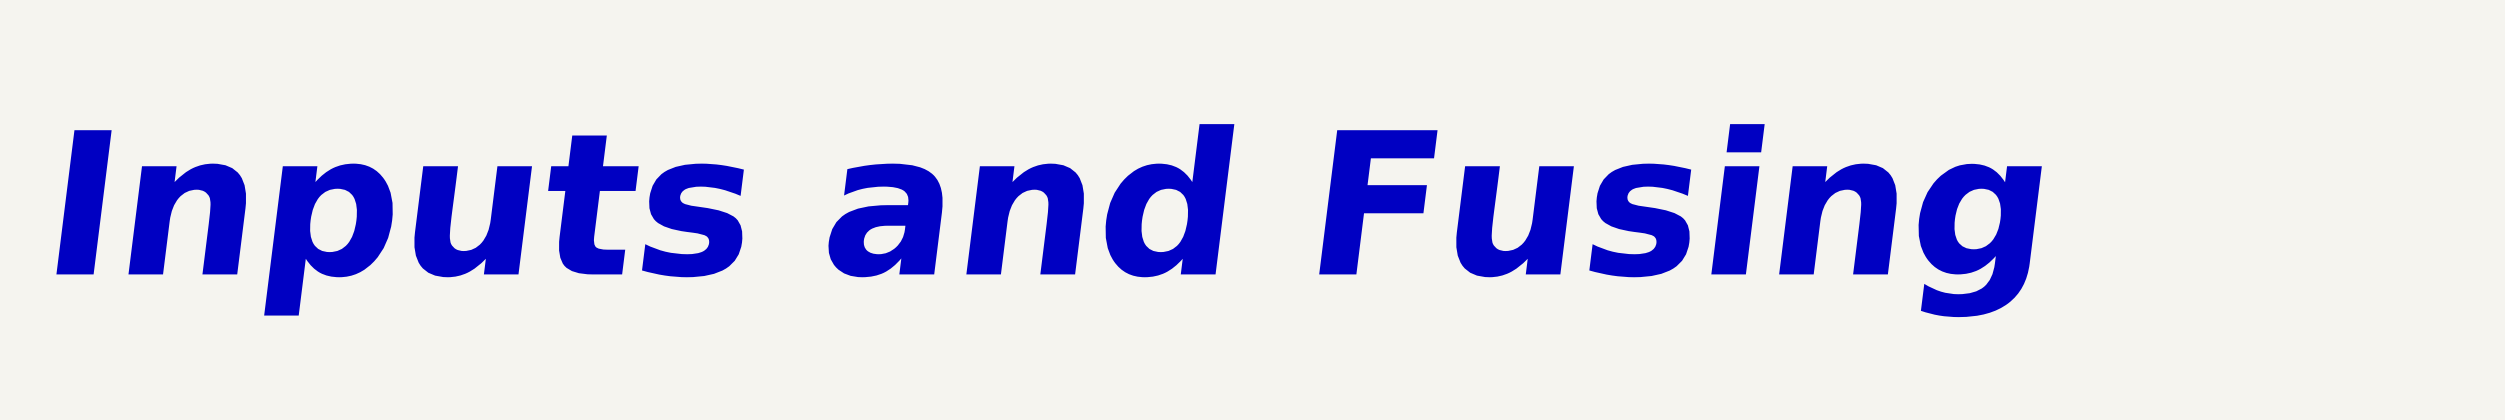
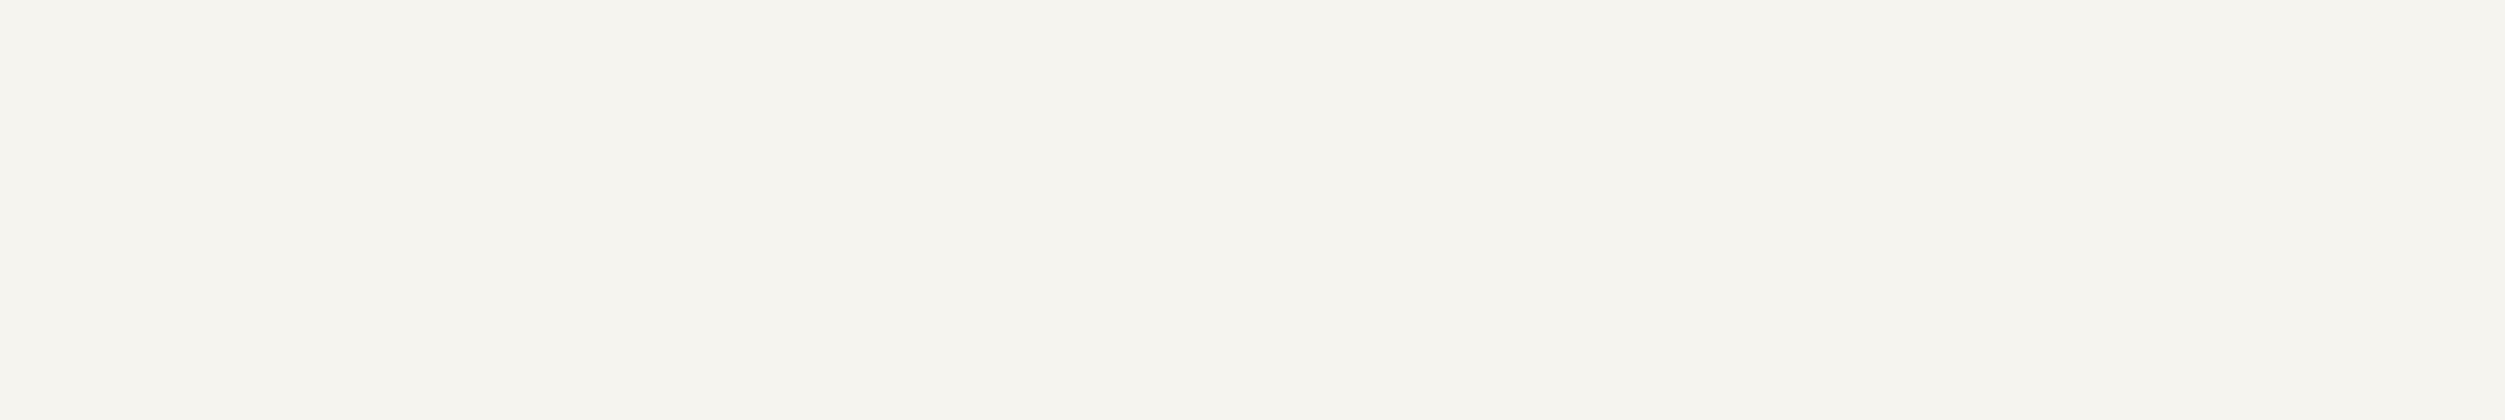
text: Inputs and Fusing (1049, 220) -> none

